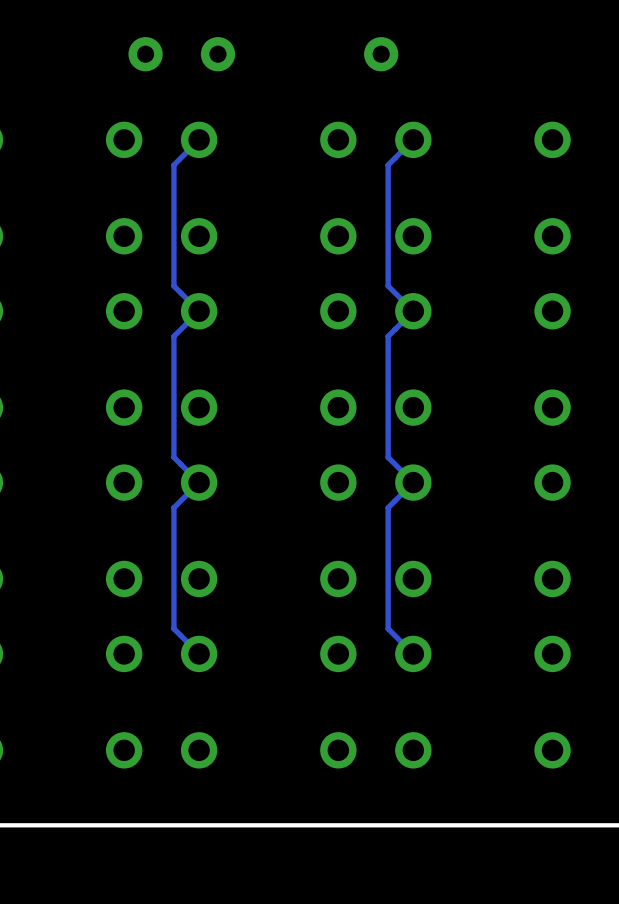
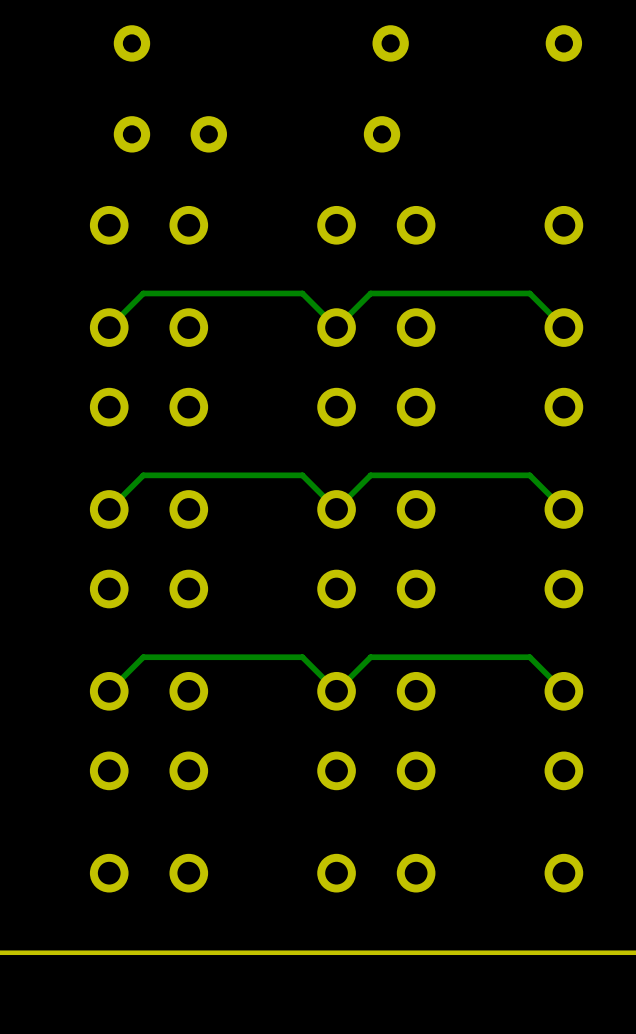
track: (199, 139) (173, 165) (173, 286) (199, 311) (173, 336) (173, 457) (199, 482) (173, 507) (173, 628) (199, 653) -> none
track: (413, 139) (388, 165) (388, 286) (413, 311) (388, 336) (388, 457) (413, 482) (388, 507) (388, 628) (413, 653) -> none
track: none -> (563, 327) (529, 293) (370, 293) (336, 327) (302, 293) (143, 293) (109, 327)
track: none -> (563, 509) (529, 475) (370, 475) (336, 509) (302, 475) (143, 475) (109, 509)
track: none -> (563, 691) (529, 657) (370, 657) (336, 691) (302, 657) (143, 657) (109, 691)

